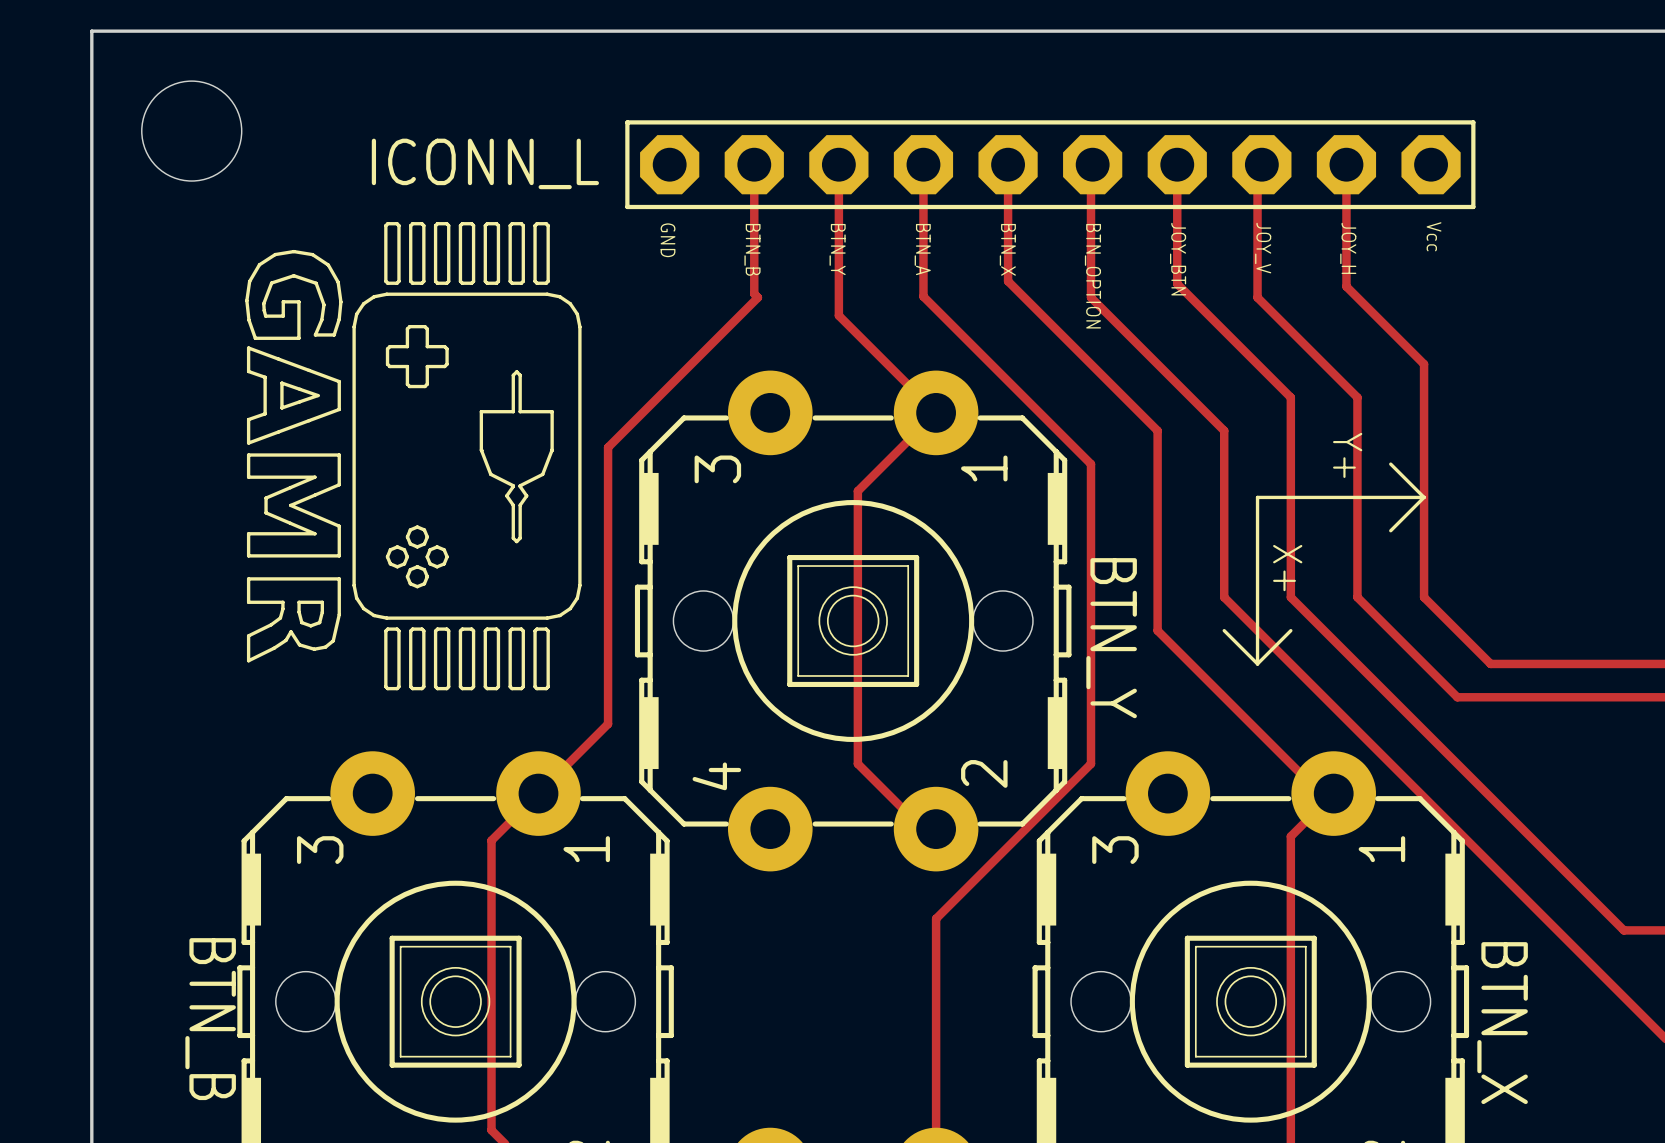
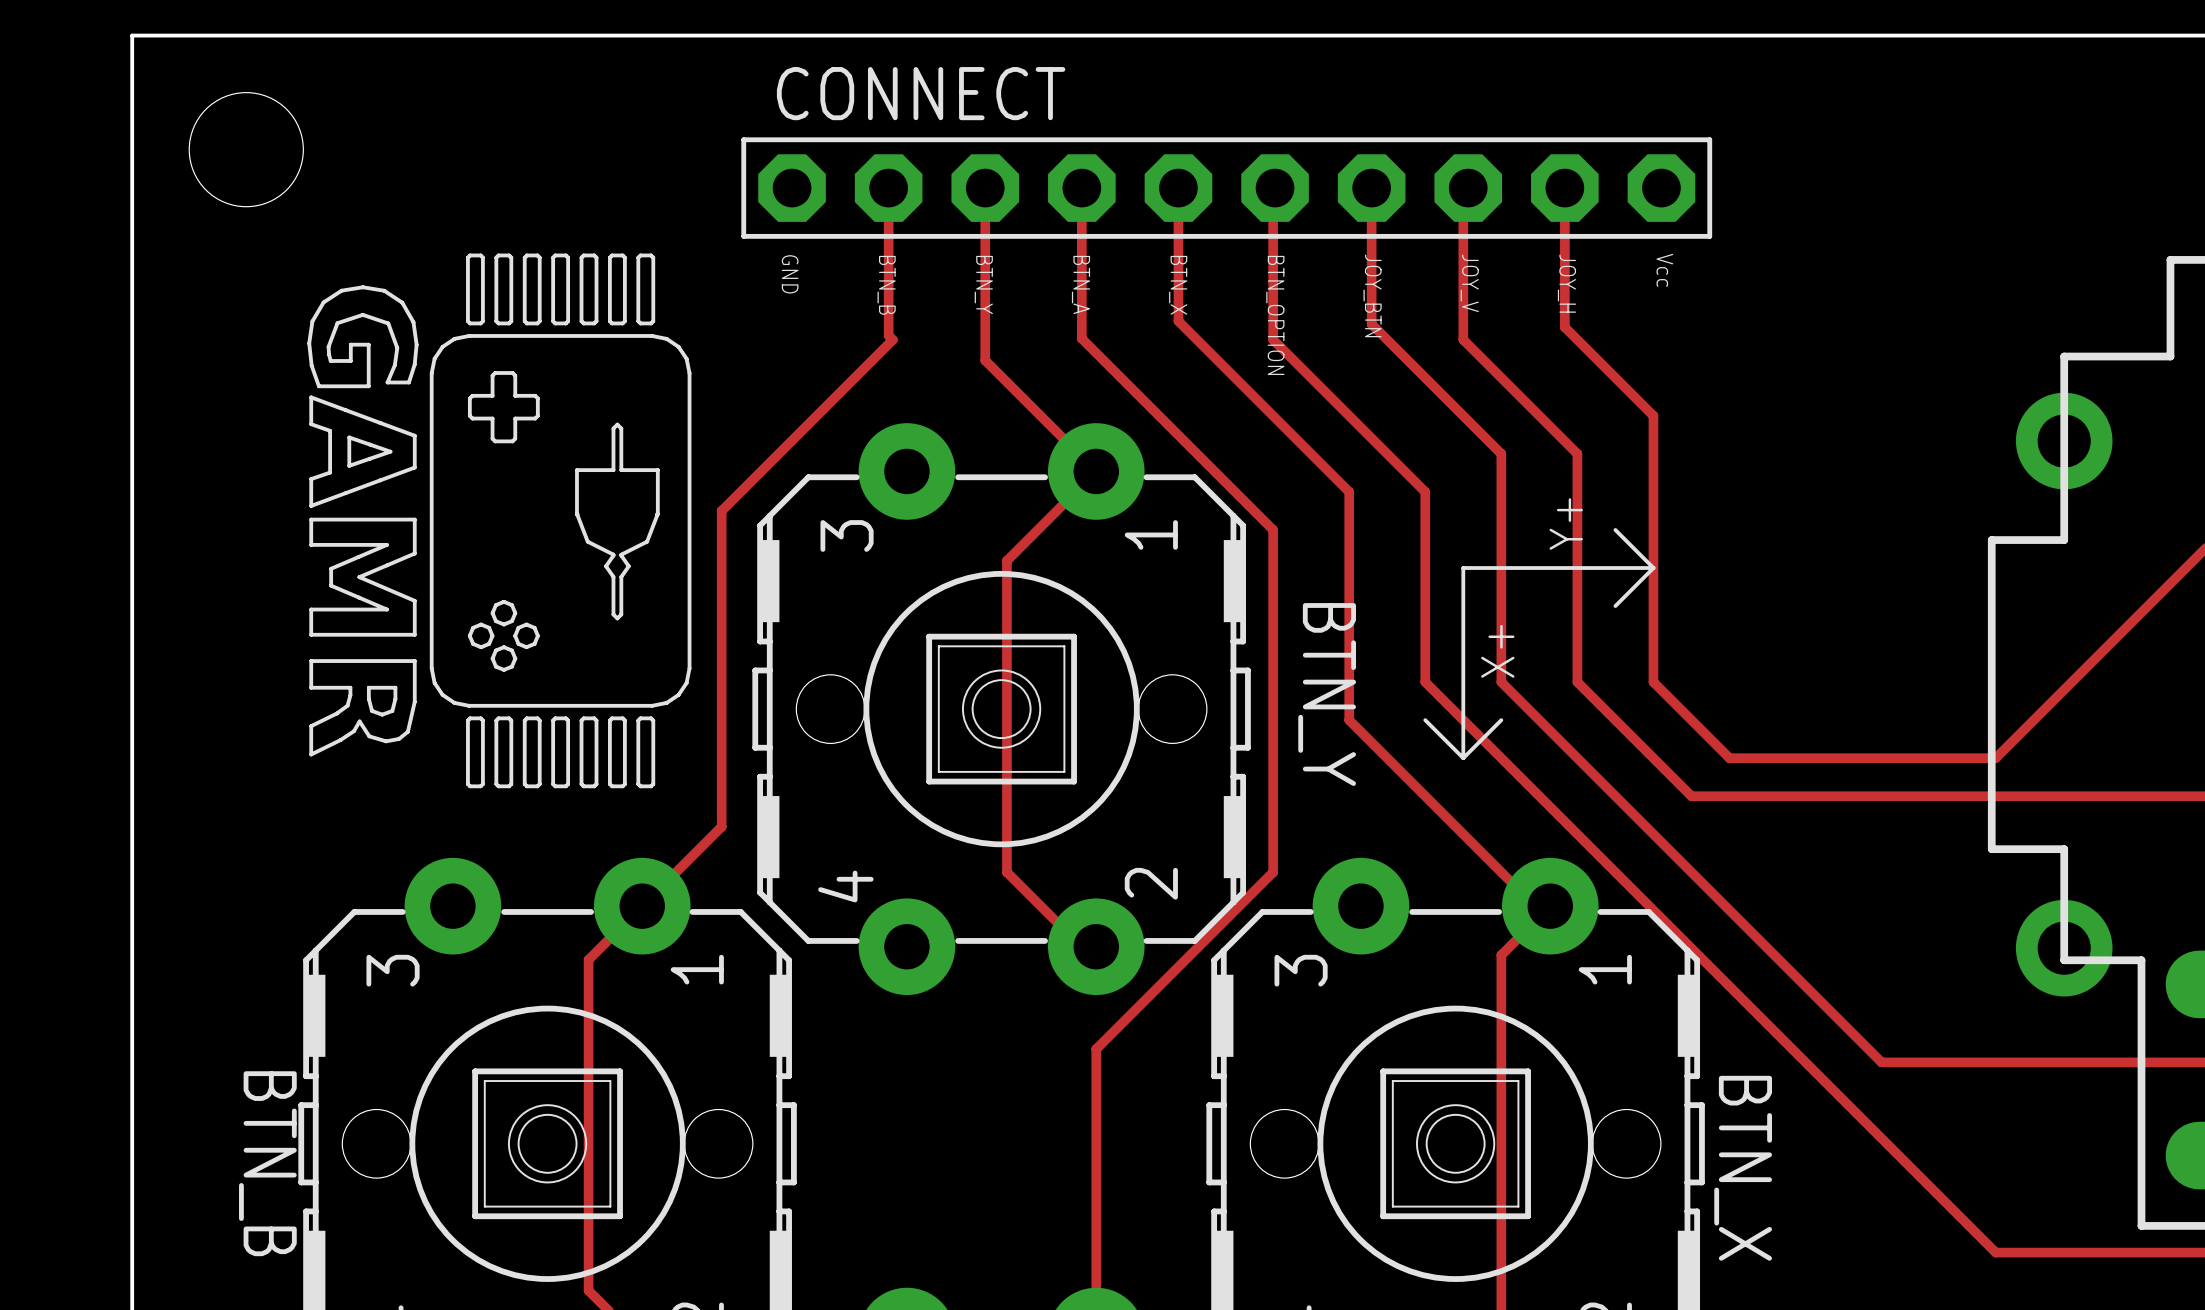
ICONN_L name: ICONN_L (485, 163) -> CONNECT (921, 93)
text rotation: 0° (1347, 455) -> 180° (1566, 524)
text rotation: 0° (1287, 568) -> 180° (1497, 651)
BTN_Y name position: BTN_Y (1111, 638) -> BTN_Y (1327, 694)

